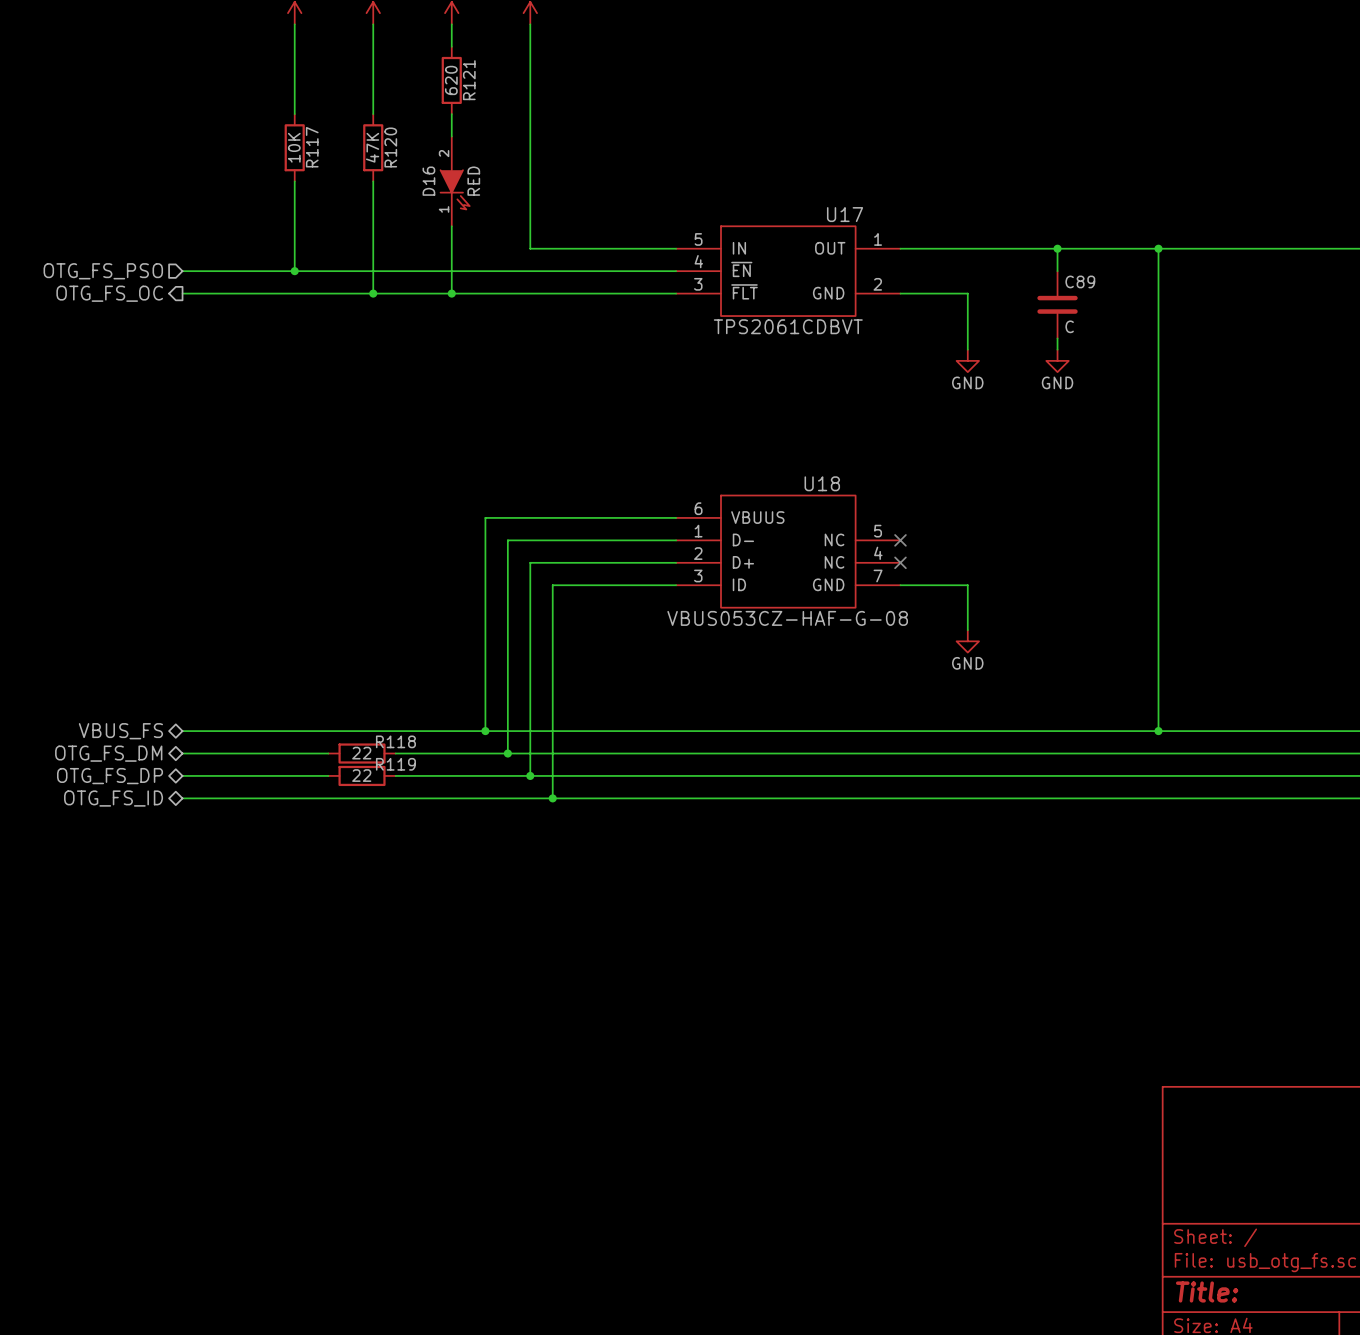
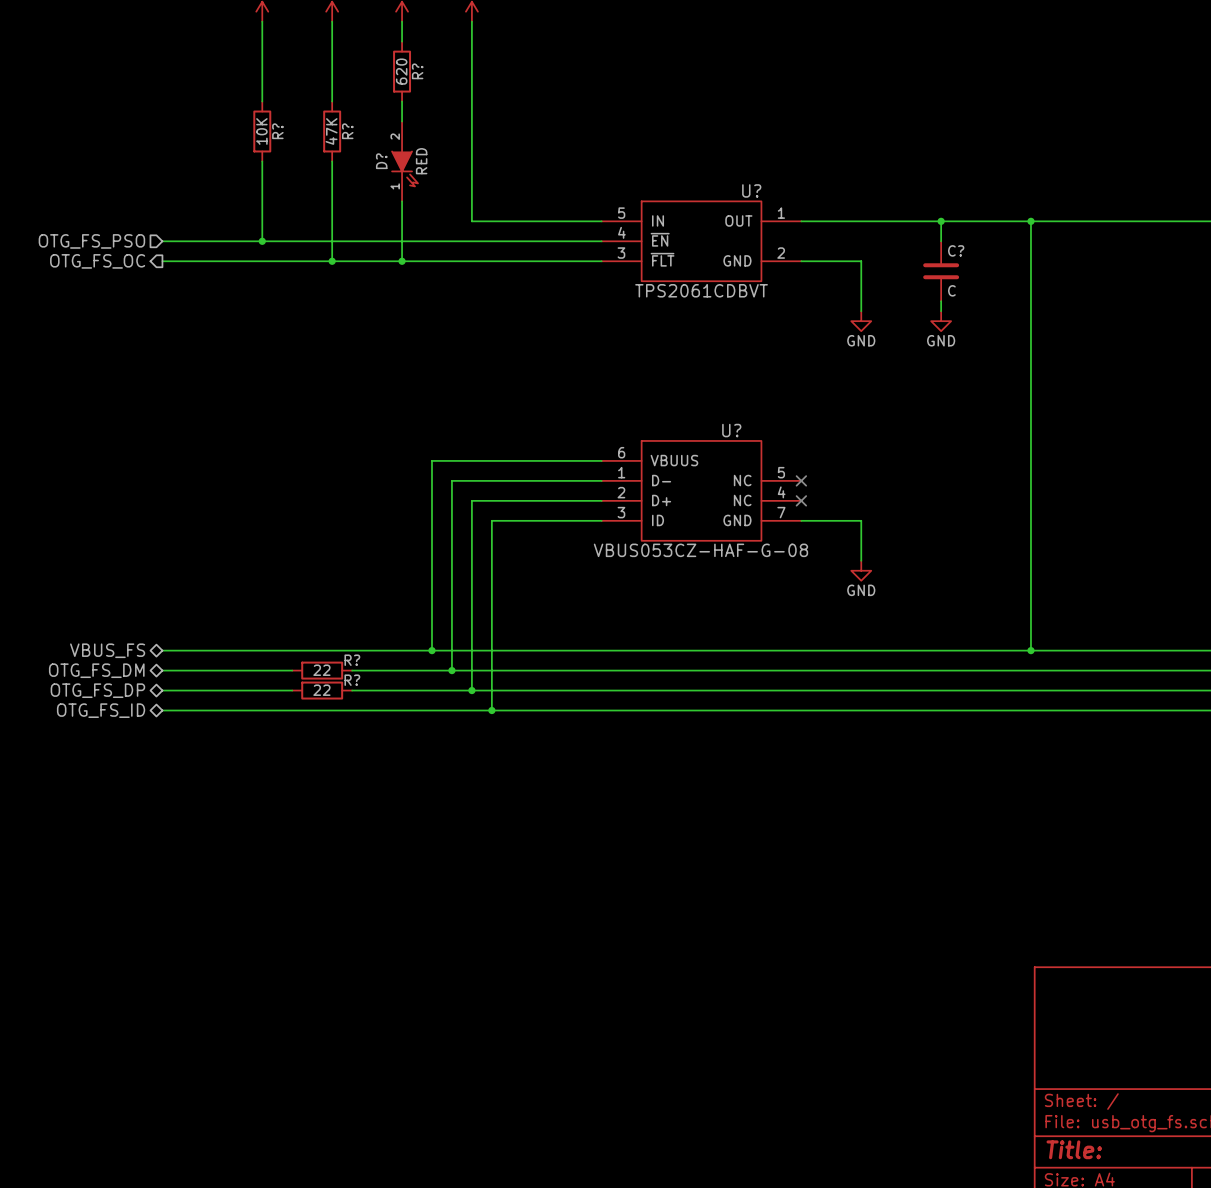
R121 name: R121 (469, 80) -> R? (417, 71)
R117 name: R117 (312, 147) -> R? (277, 131)
R120 name: R120 (390, 147) -> R? (347, 131)
D16 name: D16 (428, 181) -> D? (381, 161)
U17 name: U17 (845, 214) -> U? (751, 190)
C89 name: C89 (1080, 281) -> C? (956, 250)
U18 name: U18 (822, 483) -> U? (731, 430)
R118 name: R118 (395, 741) -> R? (352, 660)
R119 name: R119 (395, 764) -> R? (352, 680)

